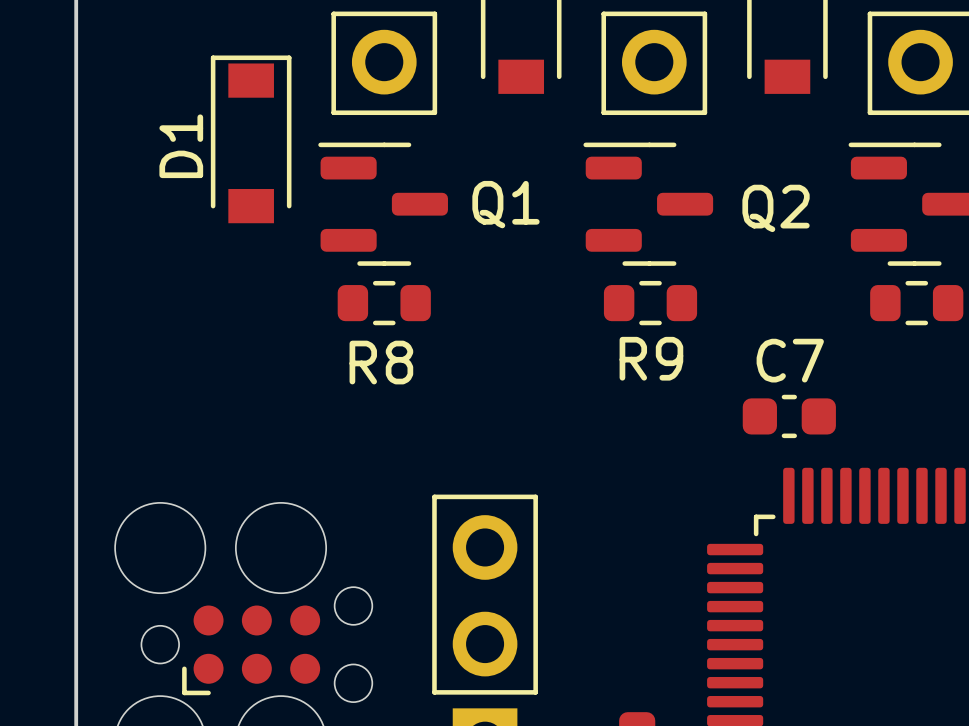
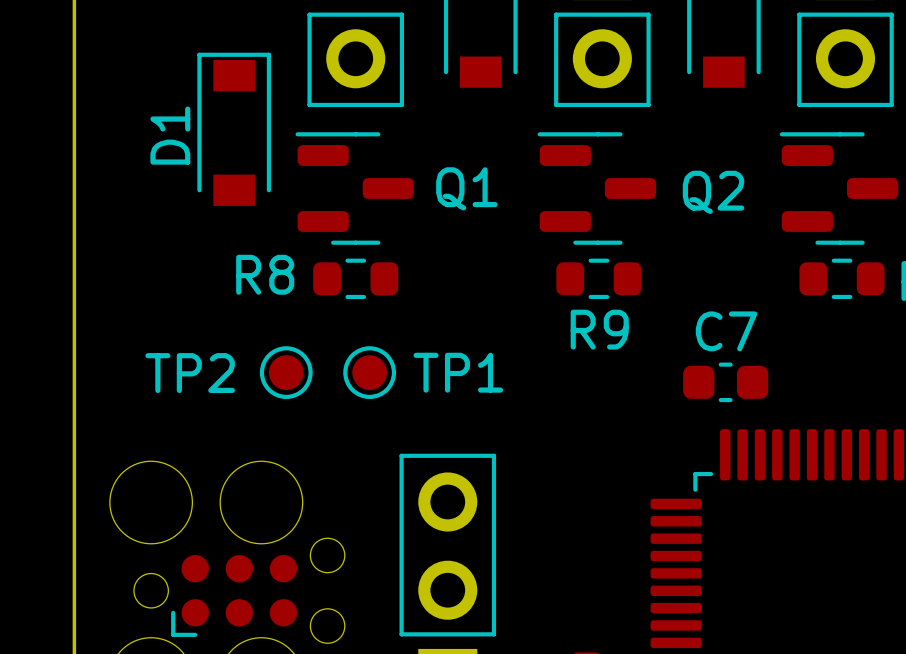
R8 name position: R8 (381, 362) -> R8 (265, 274)
TP2: none -> (286, 372)
TP1: none -> (369, 372)

